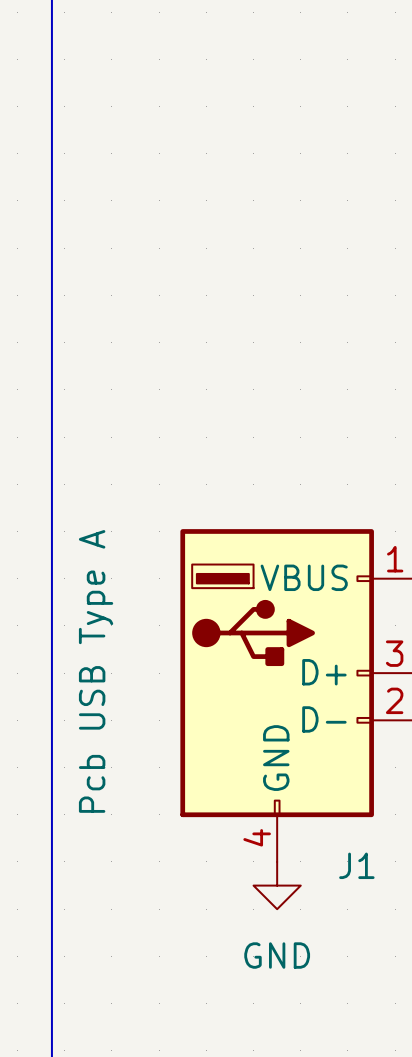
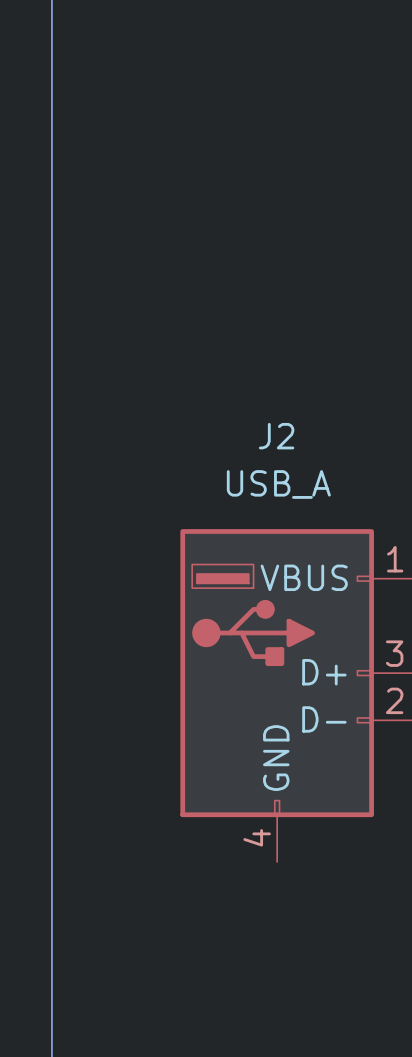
J1 value: Pcb USB Type A (96, 671) -> USB_A (278, 484)
J1 name: J1 (356, 865) -> J2 (276, 436)
power symbol: GND (277, 885) -> none

